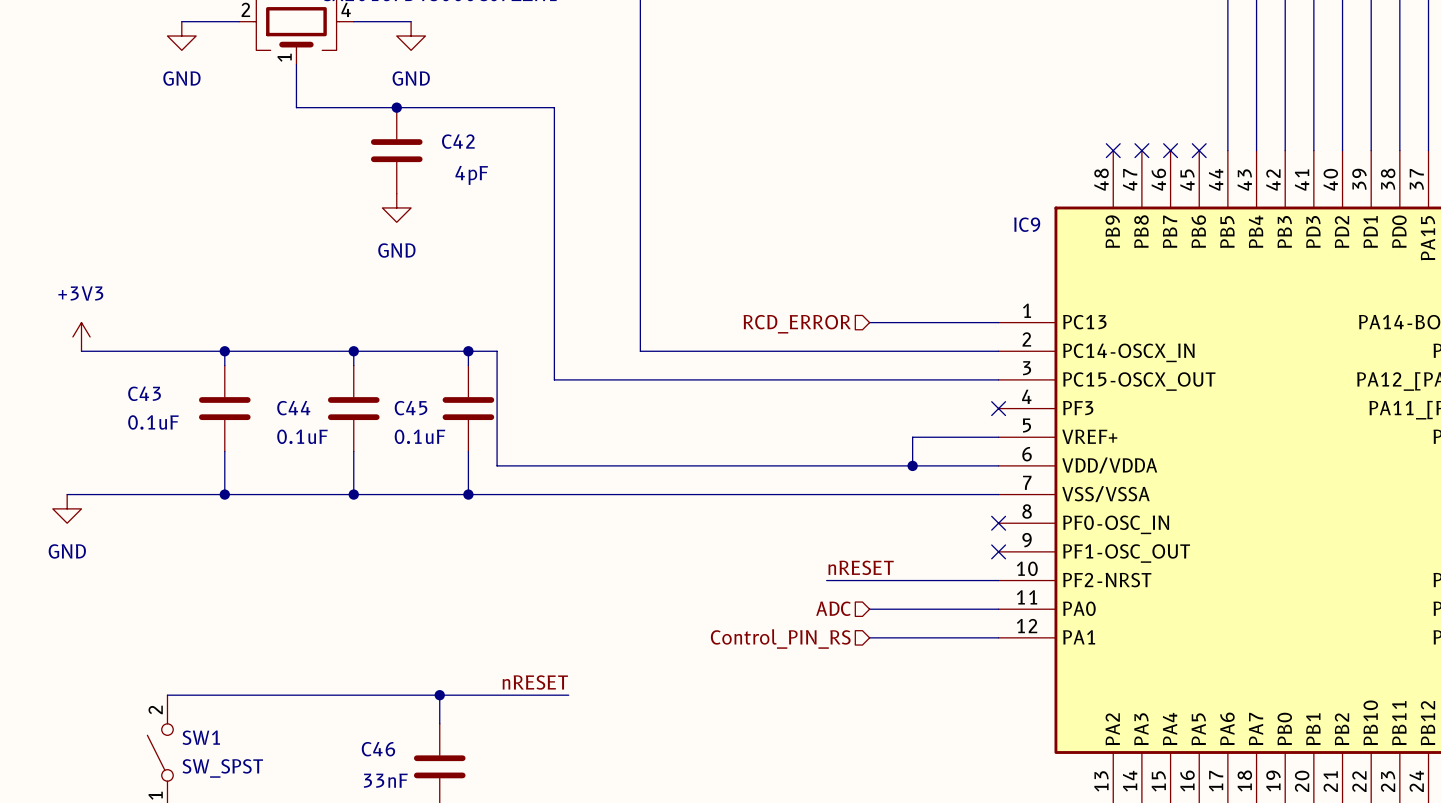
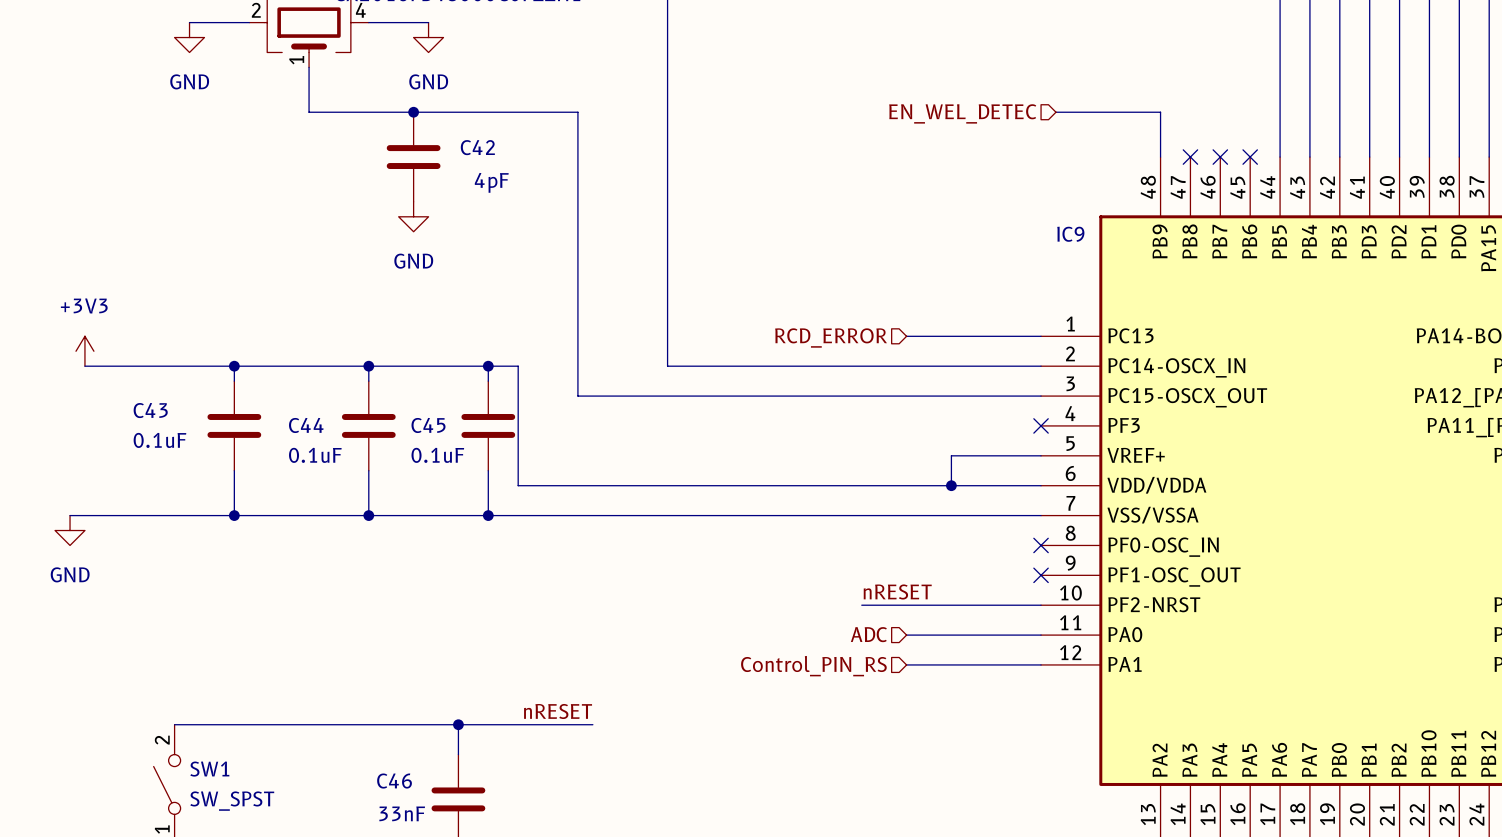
wire: none -> (1055, 112) (1160, 112) (1160, 157)
hierarchical label: none -> EN_WEL_DETEC (962, 113)
no-connect mark: (1113, 150) -> none

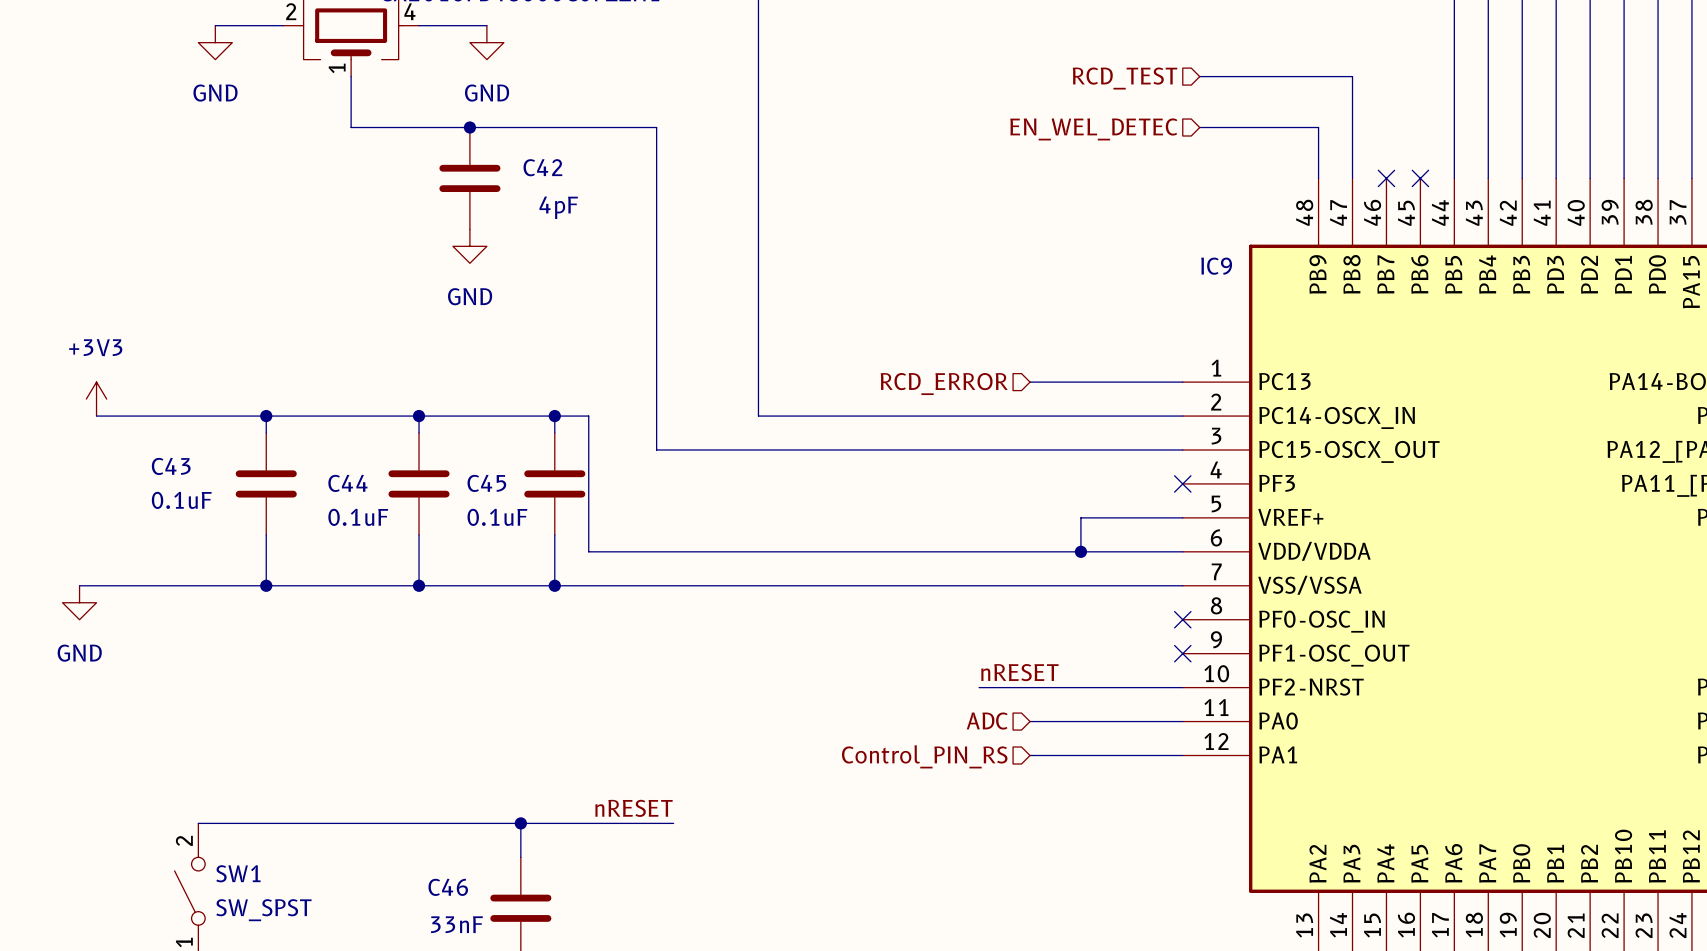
wire: none -> (1199, 76) (1352, 76) (1352, 178)
hierarchical label: none -> RCD_TEST (1124, 78)
no-connect mark: (1190, 157) -> none

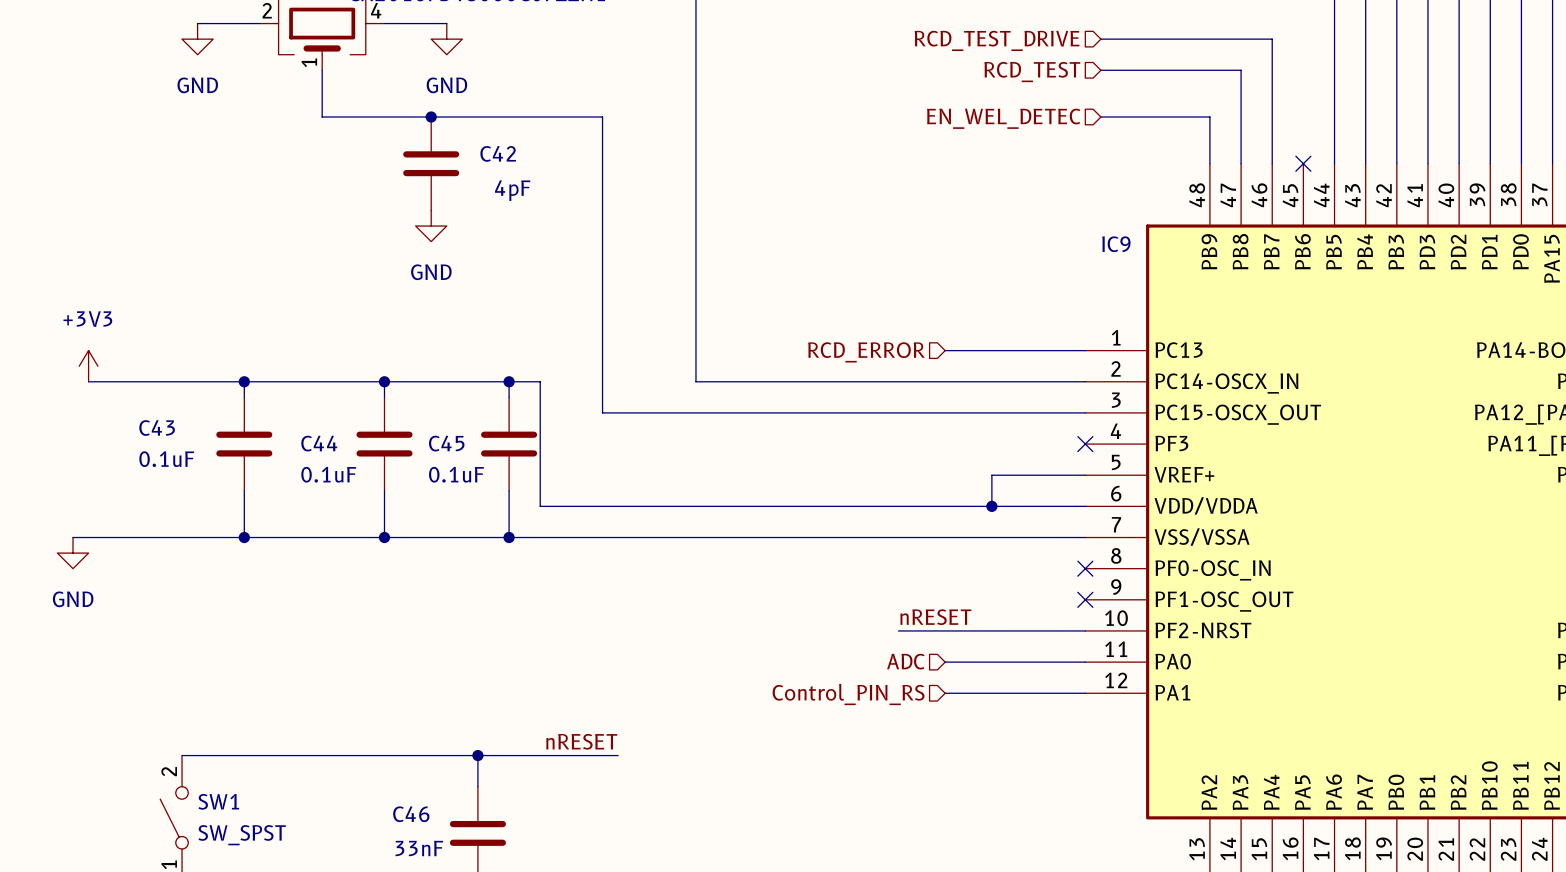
wire: none -> (1100, 39) (1272, 39) (1272, 163)
hierarchical label: none -> RCD_TEST_DRIVE (997, 40)
no-connect mark: (1386, 178) -> none

